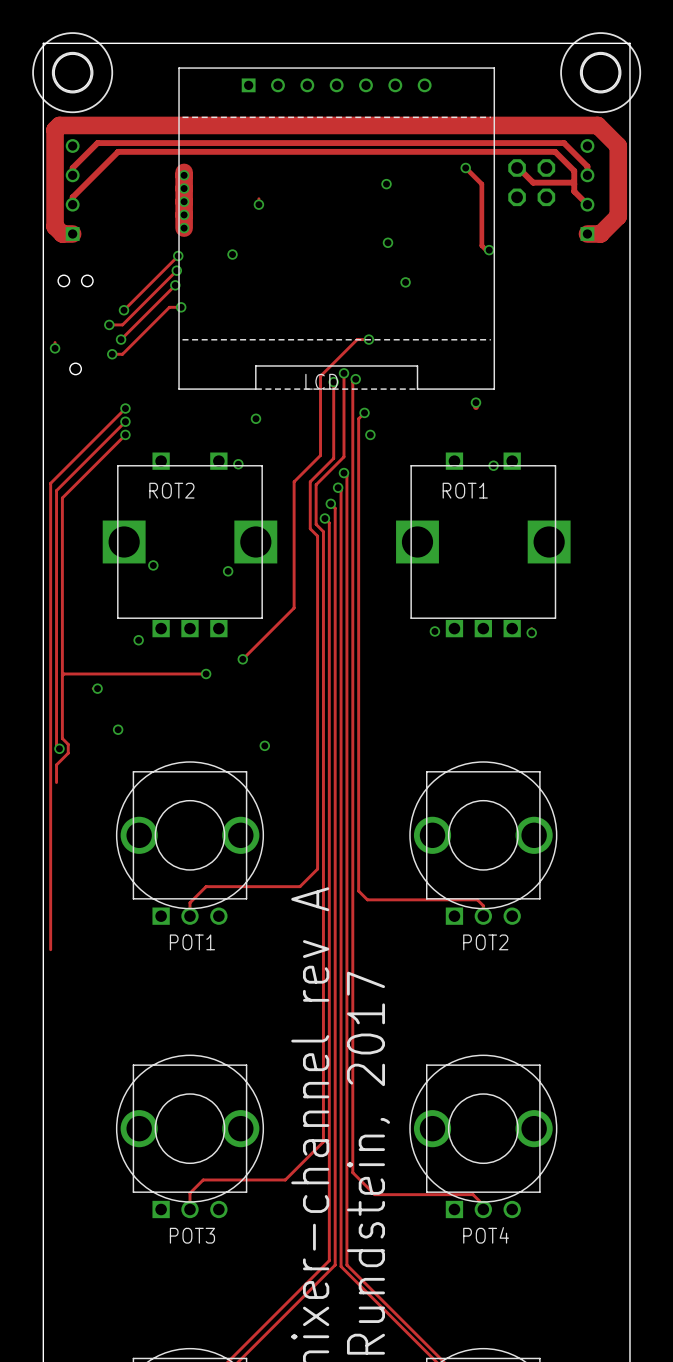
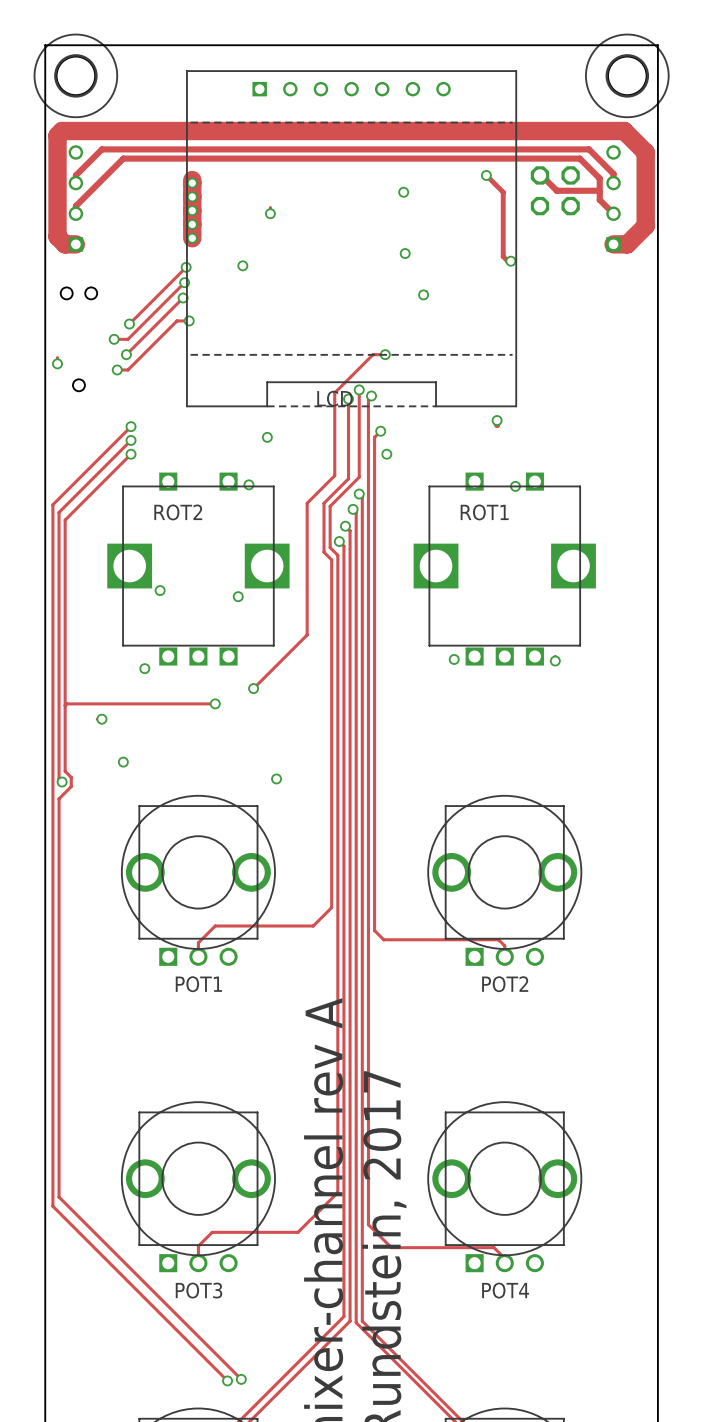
track: none -> (59, 817) (59, 1197) (241, 1379)
track: none -> (52, 991) (52, 1206) (227, 1380)
via: none -> (241, 1379)
via: none -> (227, 1380)

